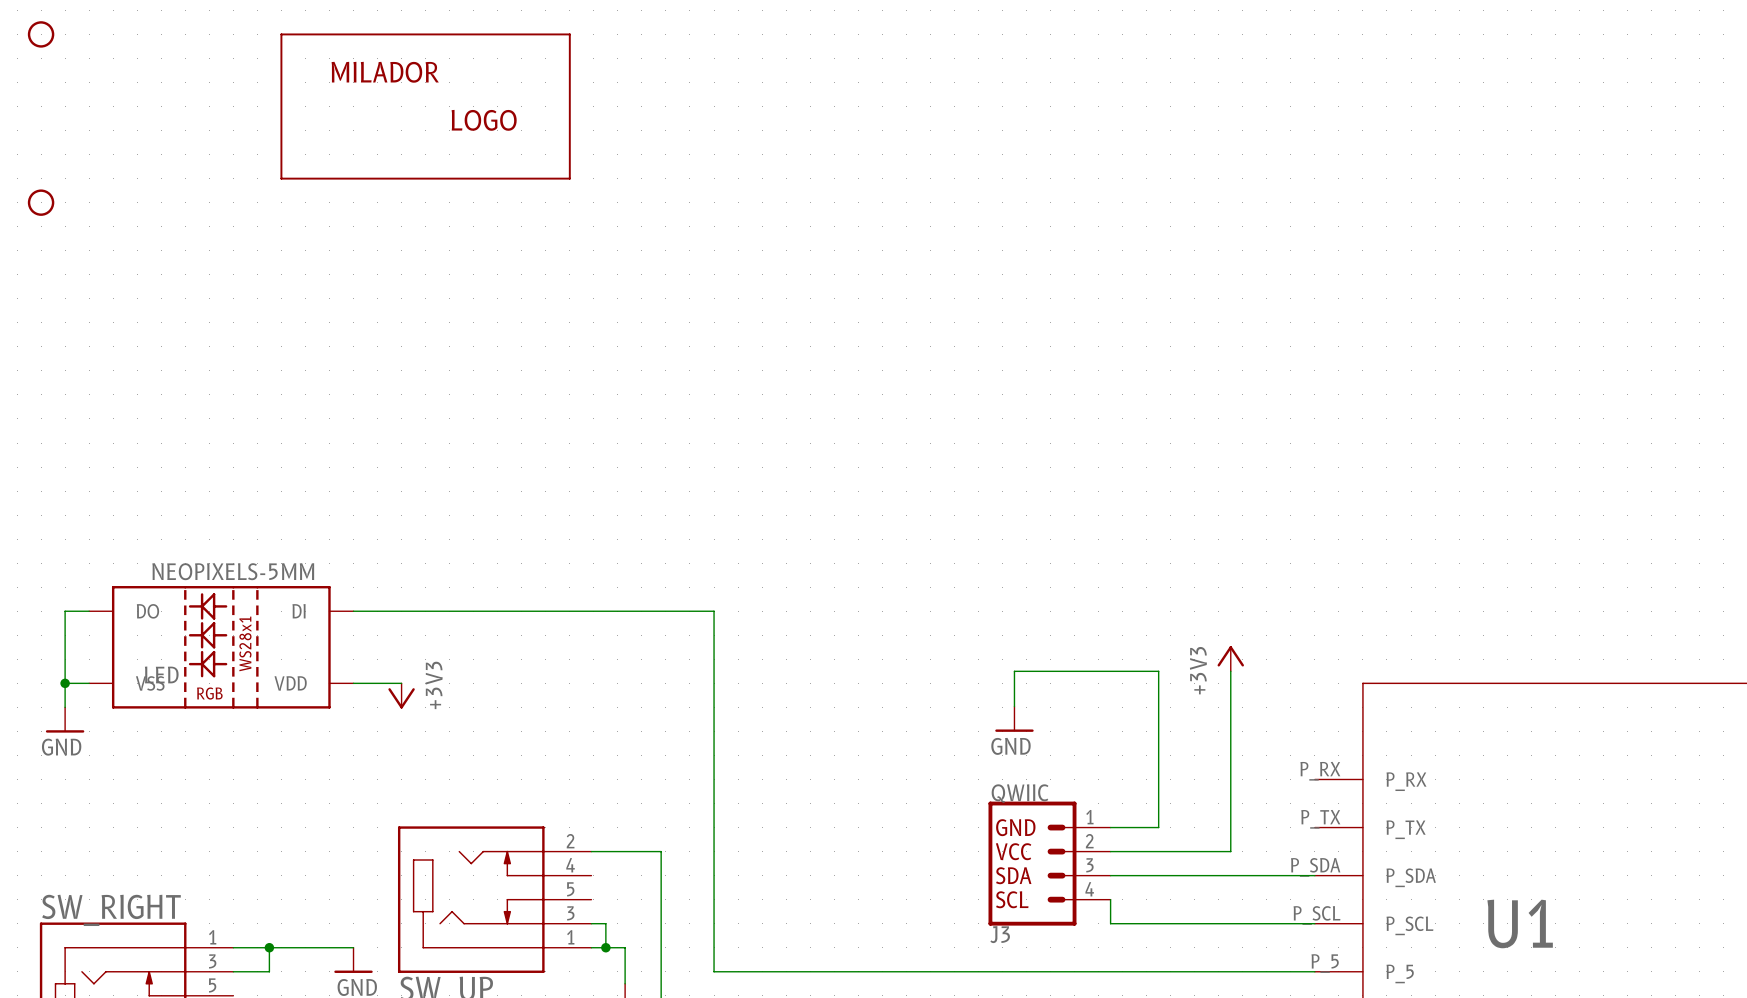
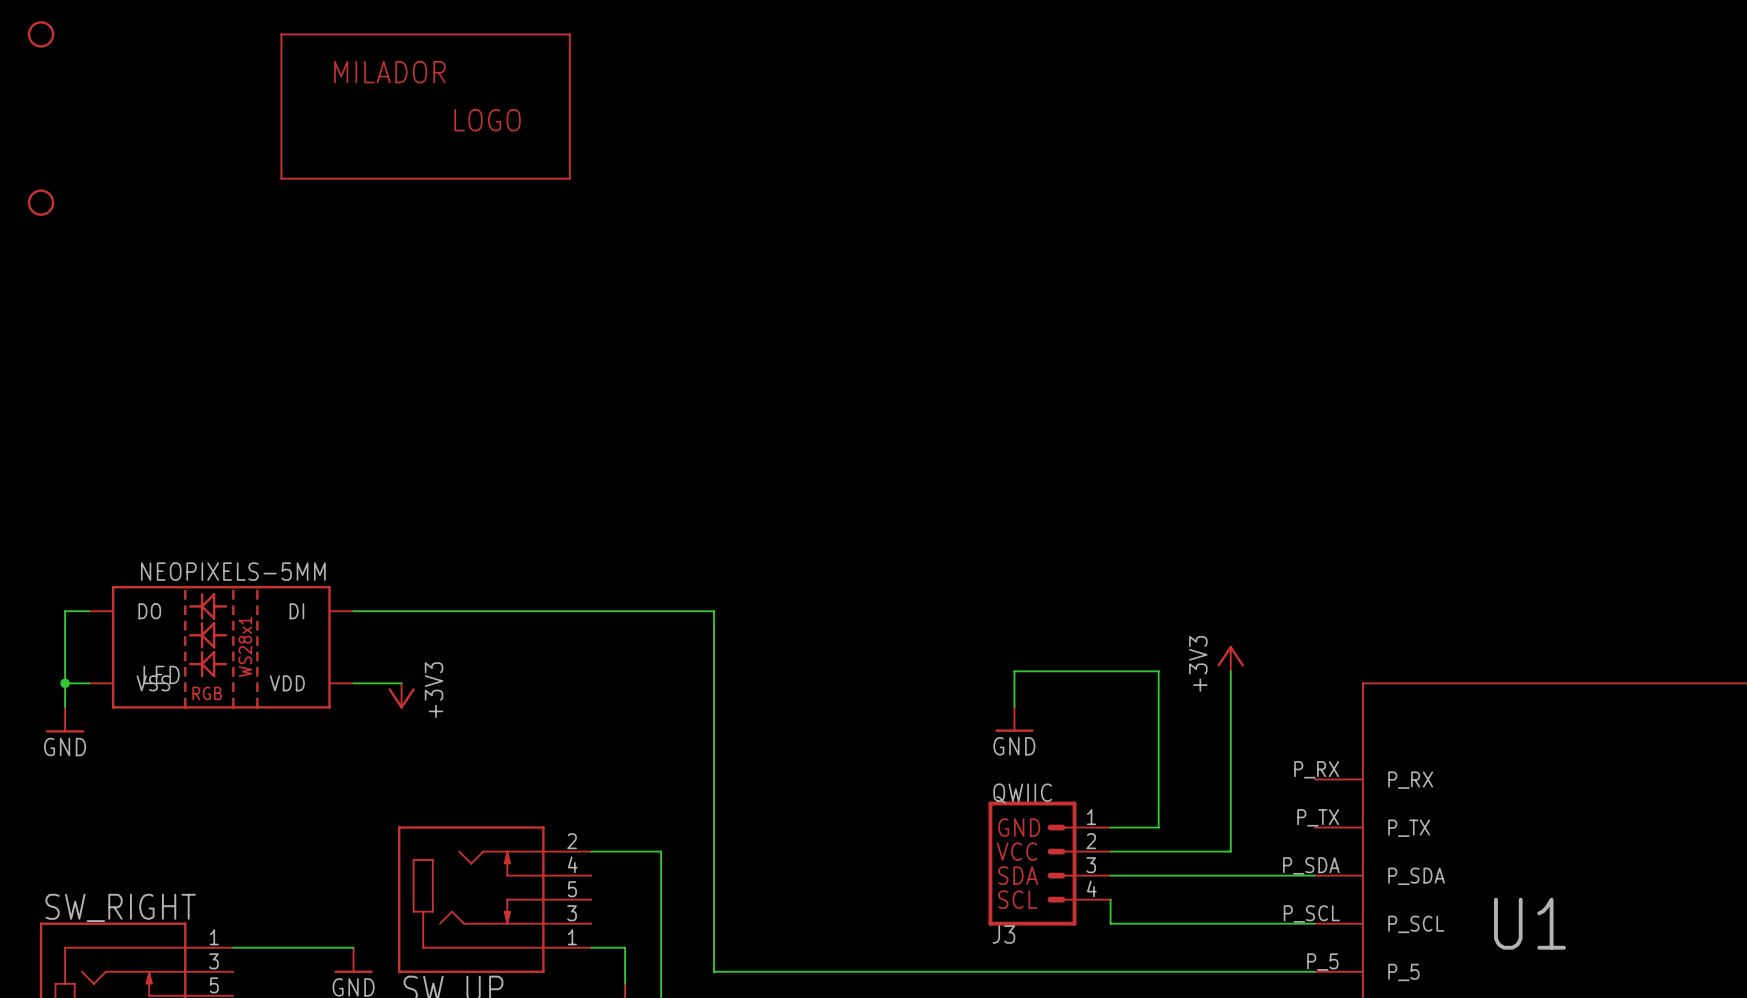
wire: (591, 923) (605, 923) (605, 947) -> none
wire: (269, 947) (269, 971) (233, 971) -> none
junction: (269, 947) -> none
junction: (605, 947) -> none

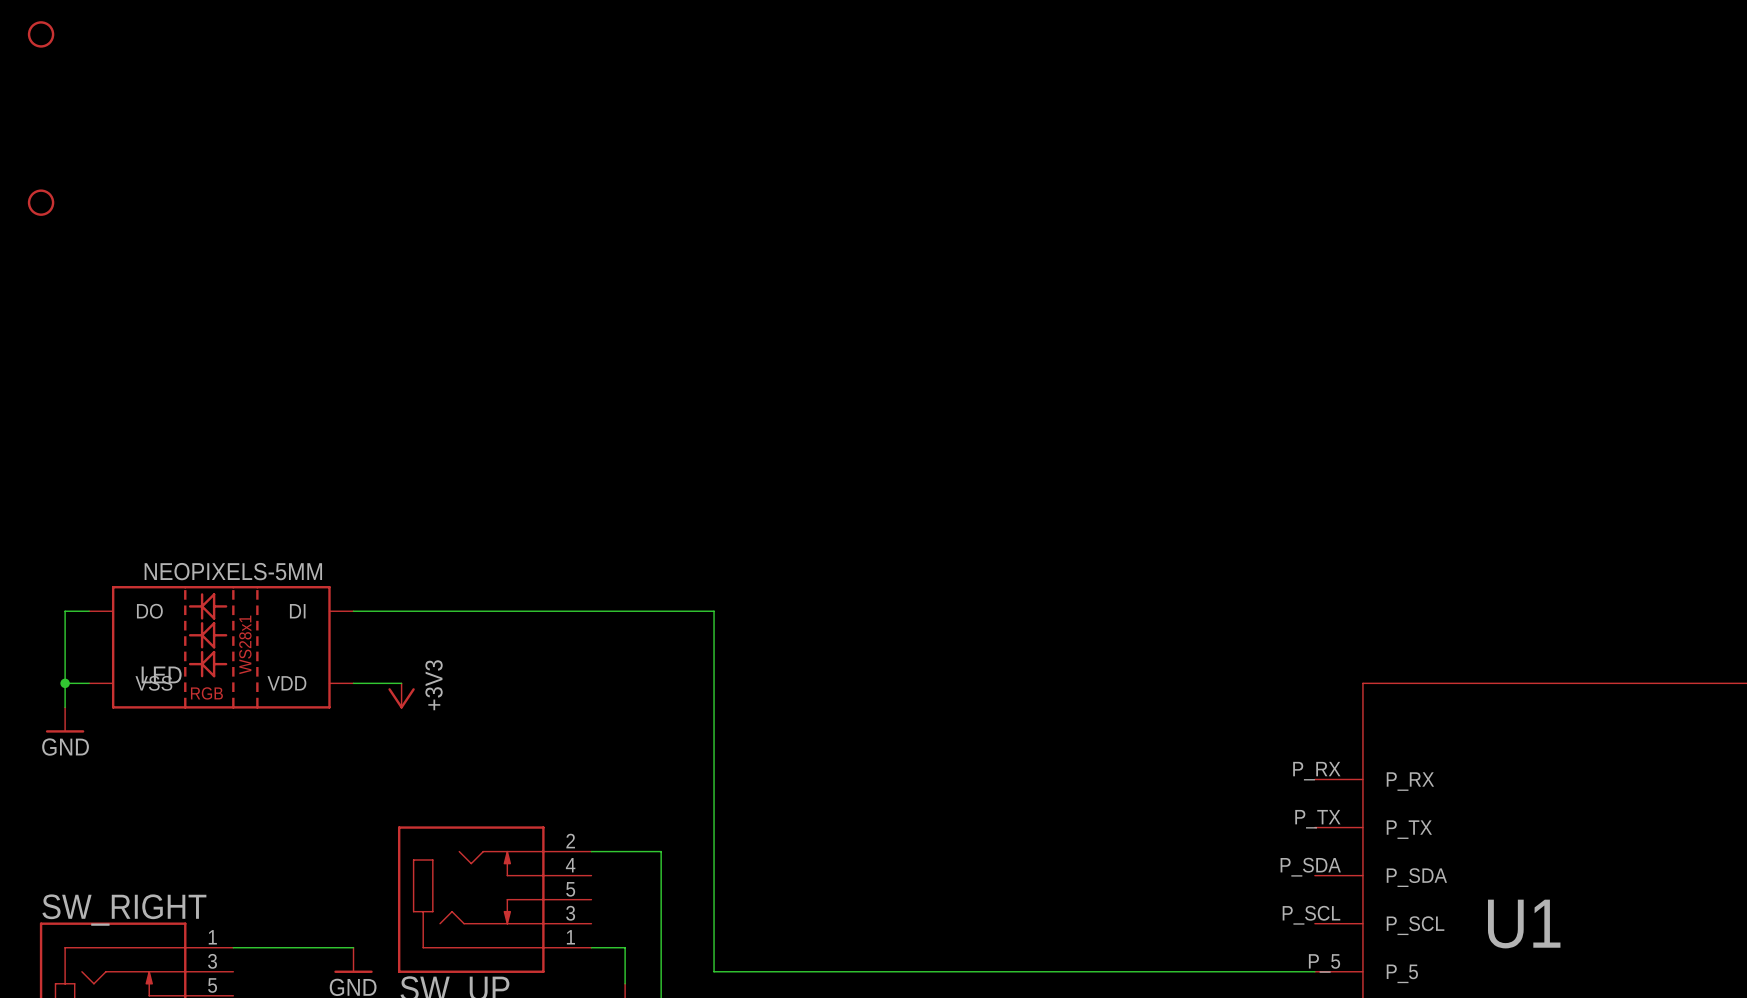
part: (425, 106) -> none
power symbol: +3V3 (1230, 658) -> none
wire: (1230, 671) (1230, 851) (1110, 851) -> none
wire: (1014, 706) (1014, 671) (1158, 671) (1158, 827) (1110, 827) -> none
power symbol: GND (1014, 719) -> none
J3: QWIIC (1049, 863) -> none
wire: (1110, 875) (1314, 875) -> none
wire: (1110, 899) (1110, 923) (1314, 923) -> none

